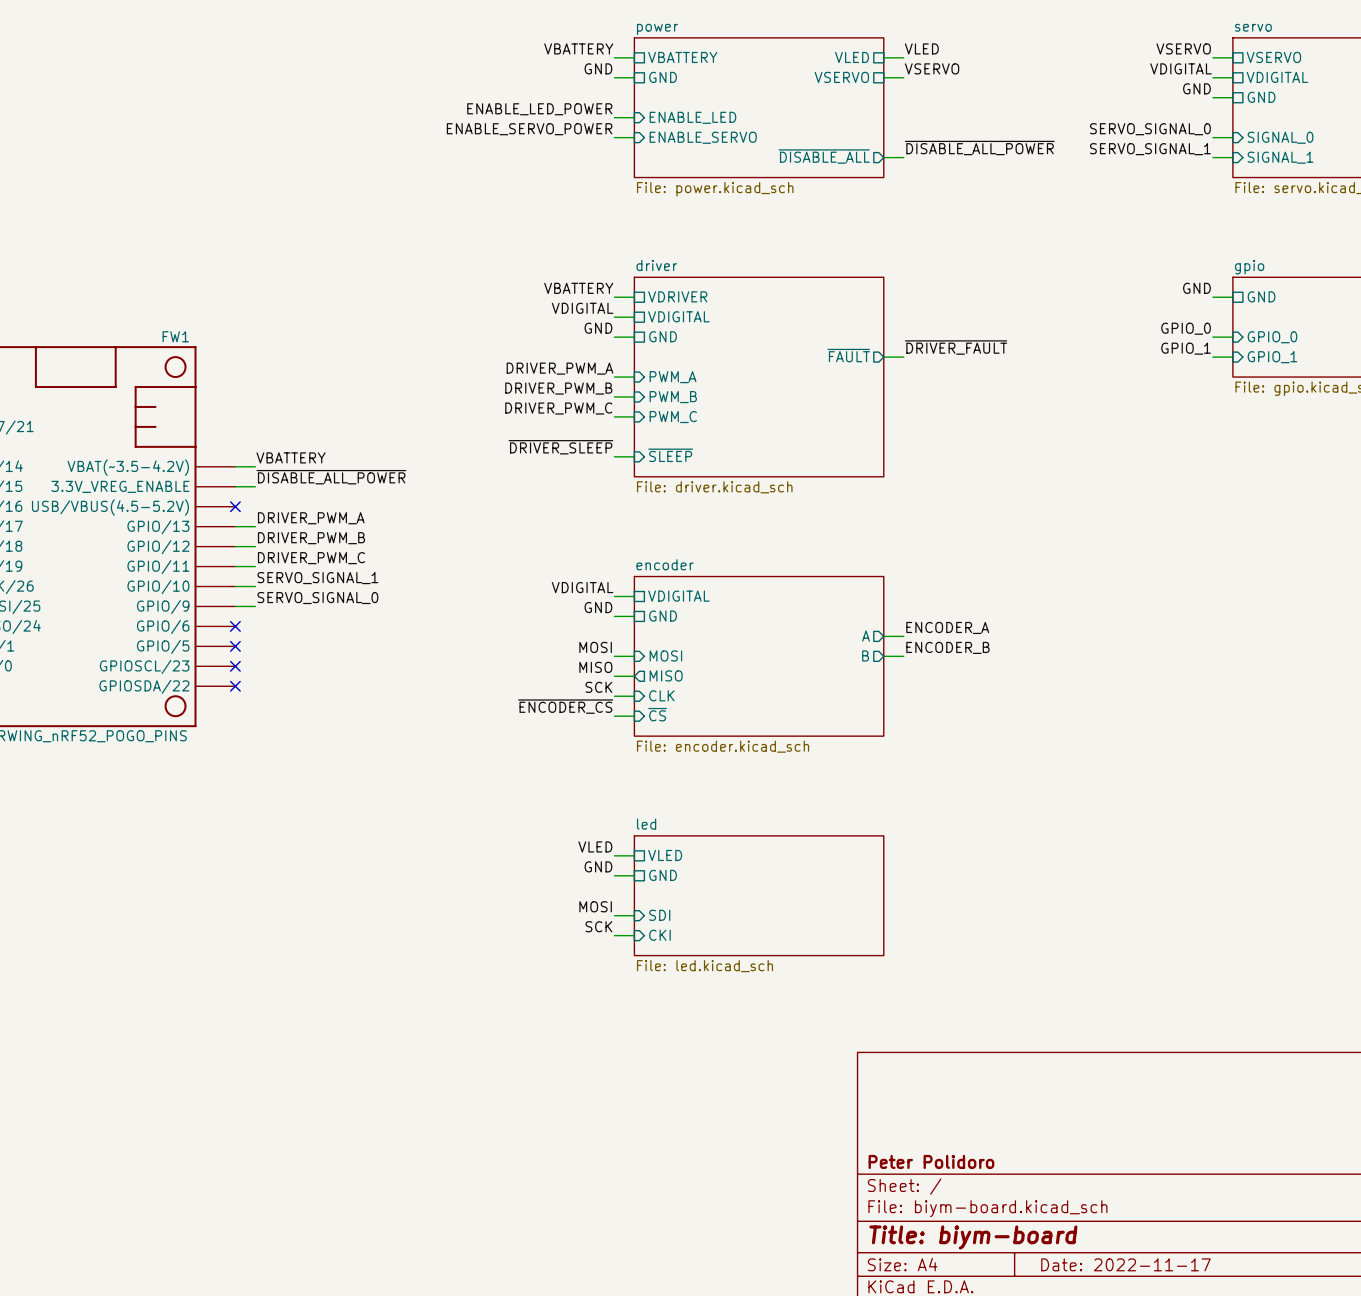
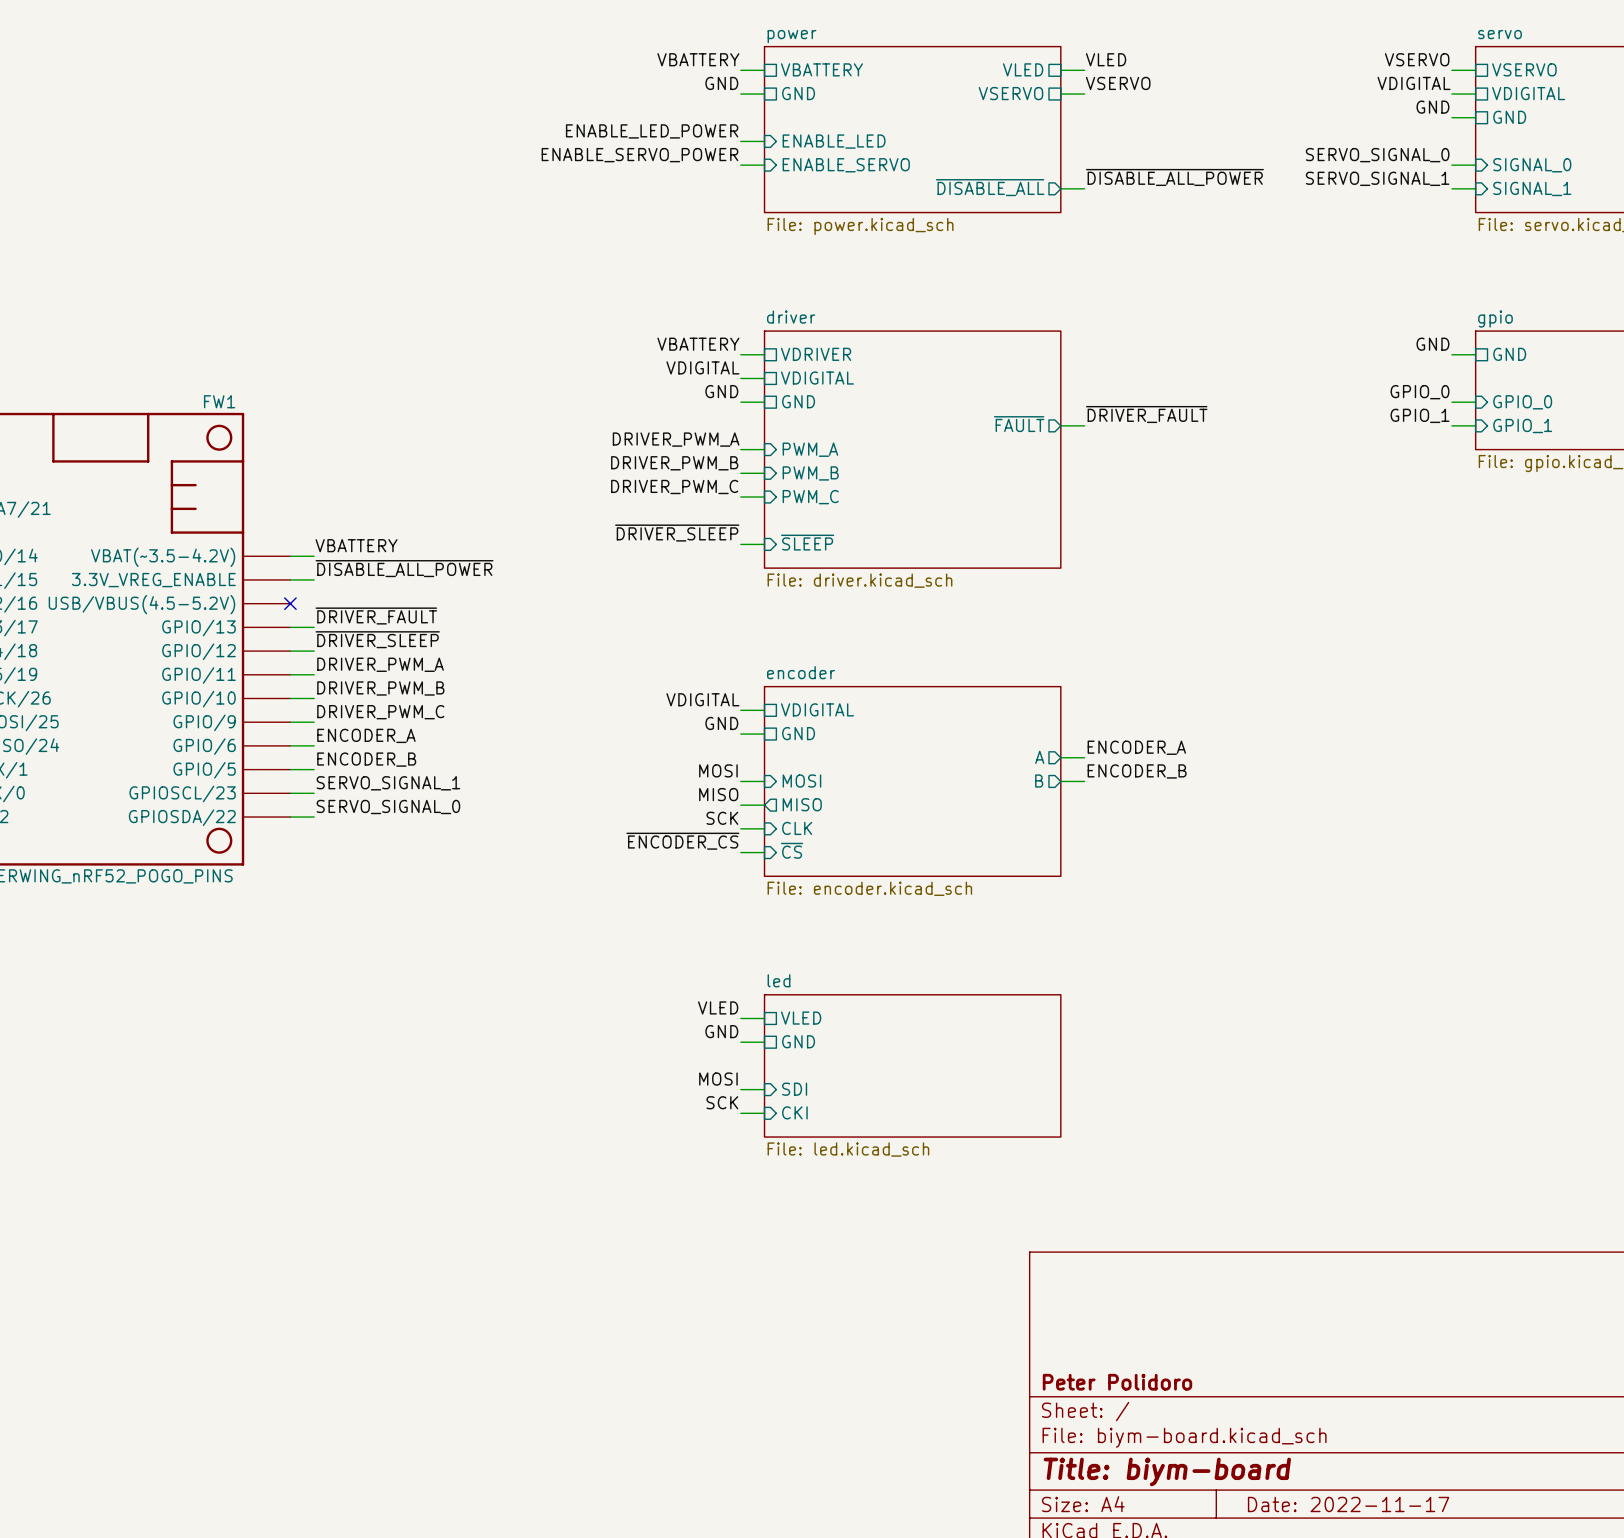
label: DRIVER_PWM_A (311, 518) -> ~{DRIVER_FAULT} (376, 616)
label: DRIVER_PWM_B (311, 538) -> ~{DRIVER_SLEEP} (377, 639)
label: DRIVER_PWM_C (311, 558) -> DRIVER_PWM_A (380, 664)
label: SERVO_SIGNAL_1 (317, 578) -> DRIVER_PWM_B (380, 688)
label: SERVO_SIGNAL_0 (317, 598) -> DRIVER_PWM_C (380, 712)
label: none -> ENCODER_A (366, 735)
wire: none -> (290, 745) (314, 745)
no-connect mark: (235, 626) -> none
label: none -> ENCODER_B (366, 759)
wire: none -> (290, 769) (314, 769)
no-connect mark: (235, 646) -> none
label: none -> SERVO_SIGNAL_1 (388, 783)
wire: none -> (290, 793) (314, 793)
no-connect mark: (235, 666) -> none
label: none -> SERVO_SIGNAL_0 (388, 807)
wire: none -> (290, 817) (314, 817)
no-connect mark: (235, 686) -> none

